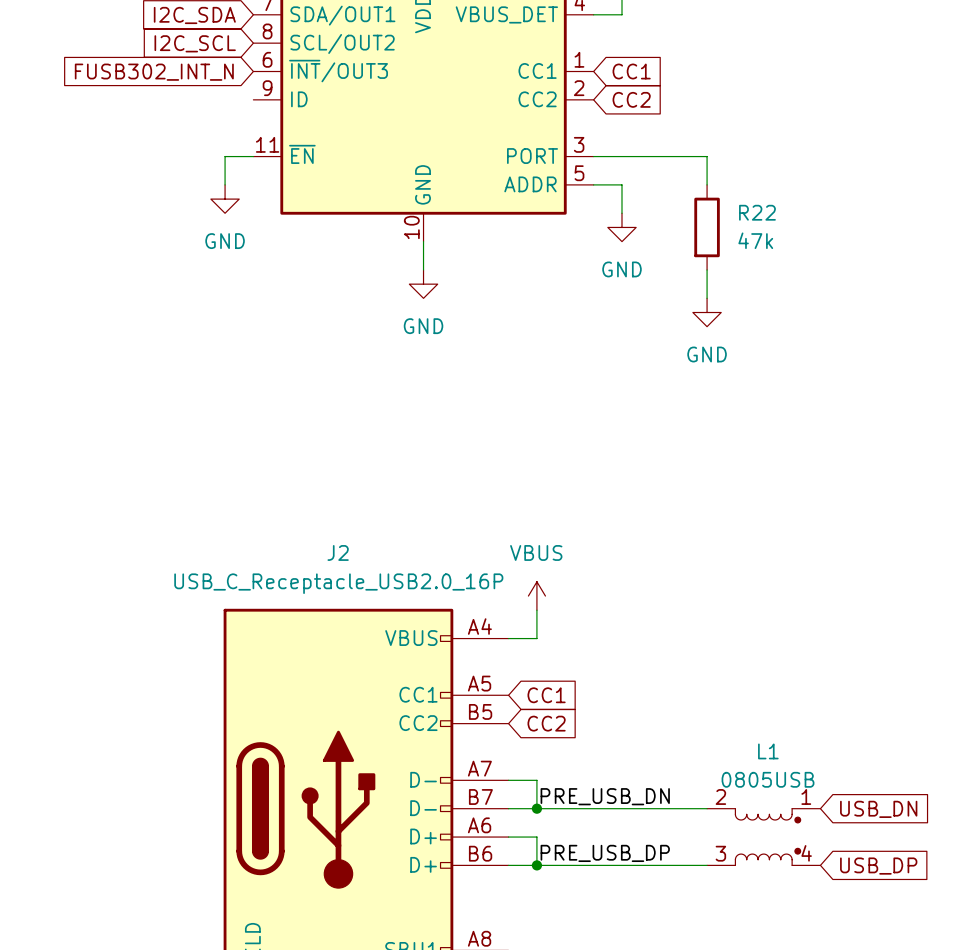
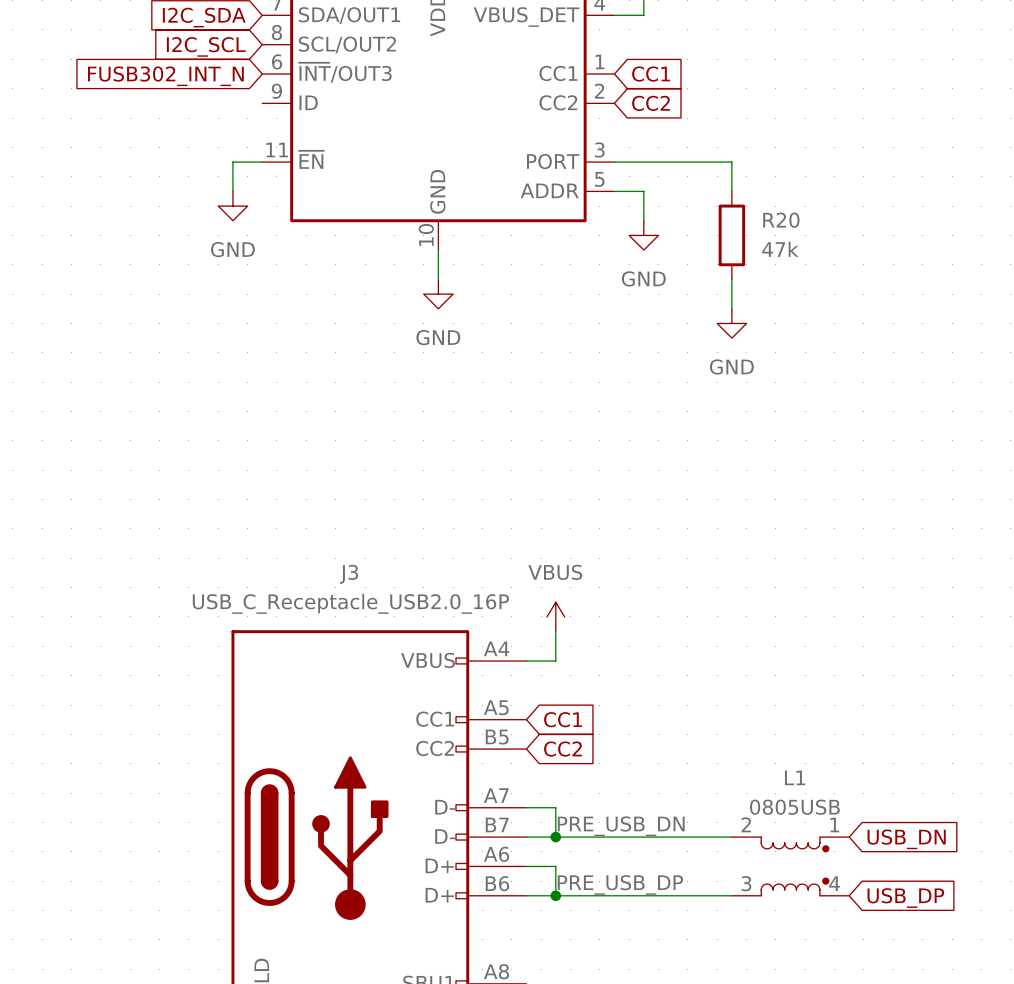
R22 name: R22 (757, 212) -> R20 (781, 220)
J2 name: J2 (338, 552) -> J3 (349, 574)

